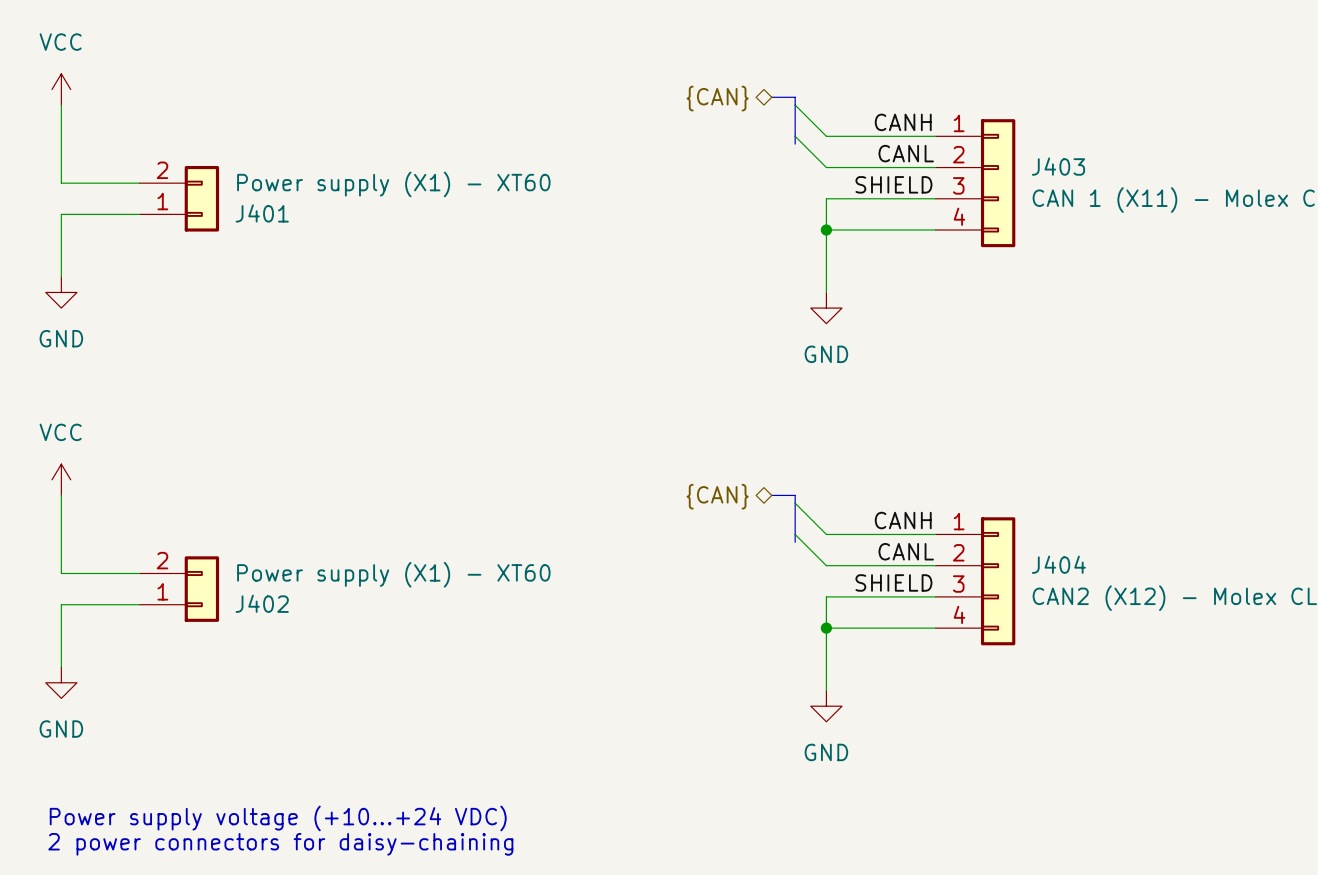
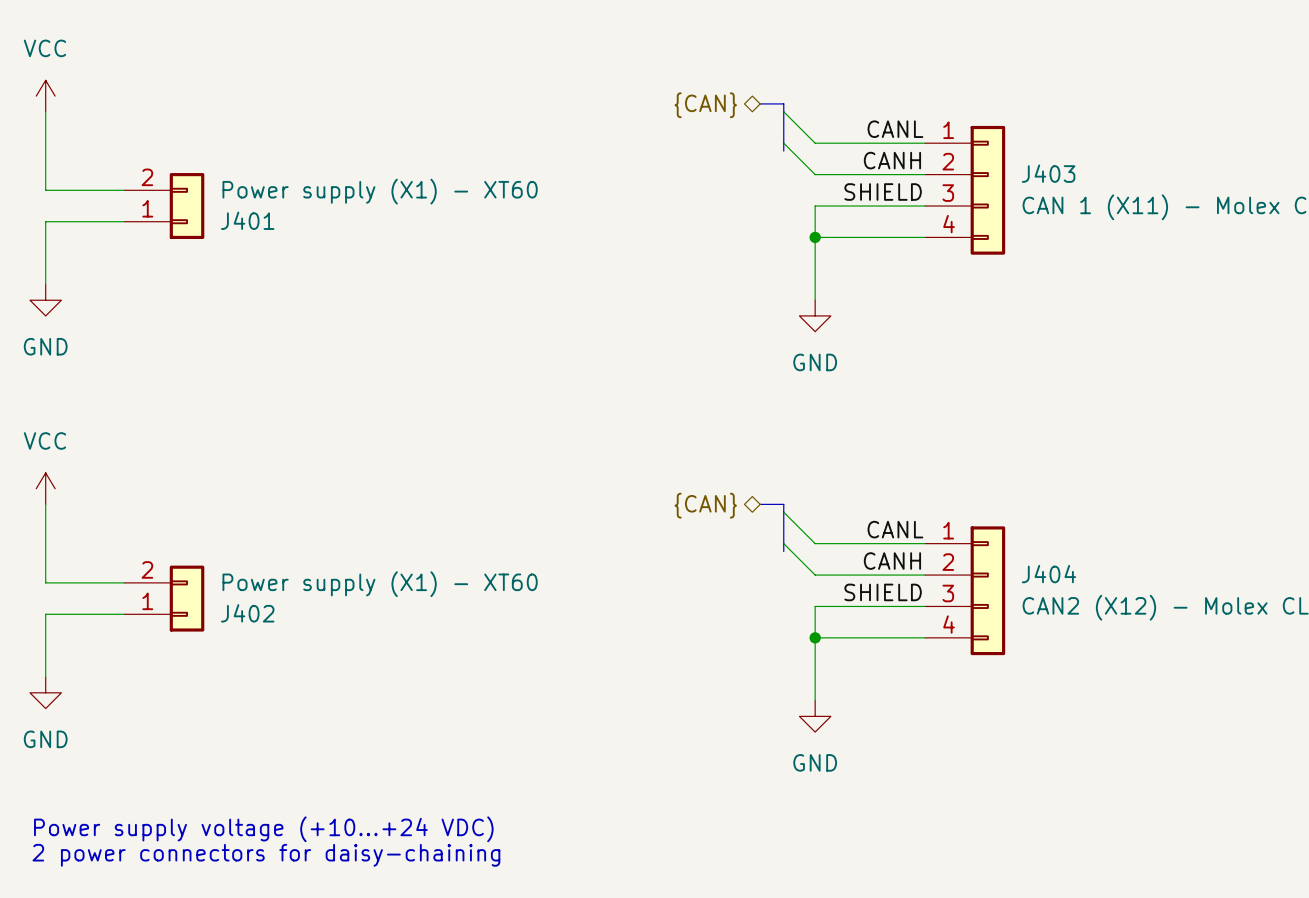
label: CANH (903, 122) -> CANL (895, 129)
label: CANL (906, 153) -> CANH (892, 160)
label: CANH (903, 520) -> CANL (895, 529)
label: CANL (906, 551) -> CANH (892, 561)

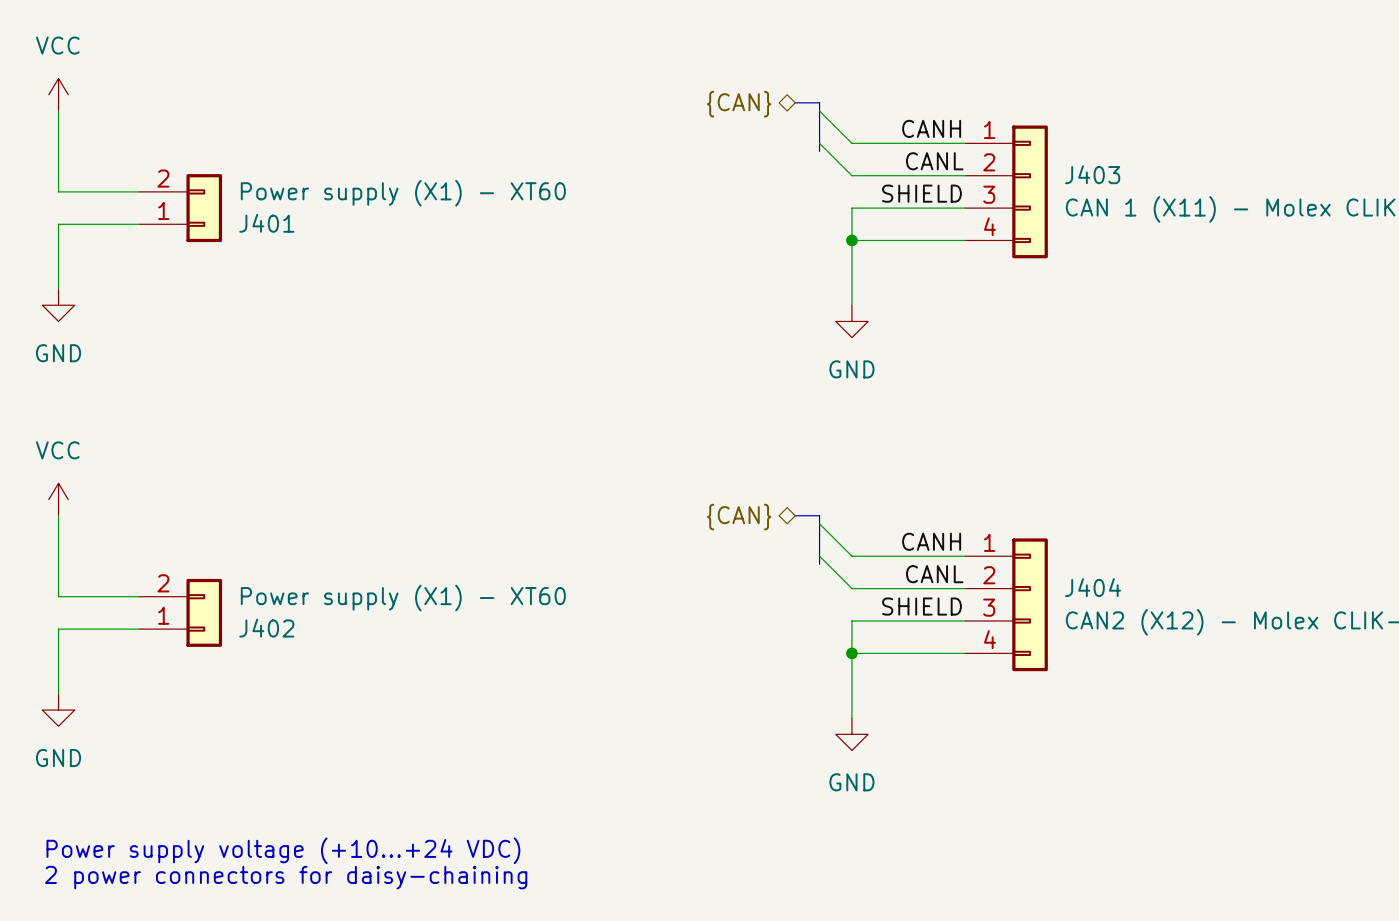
label: CANL (895, 129) -> CANH (931, 128)
label: CANH (892, 160) -> CANL (934, 161)
label: CANL (895, 529) -> CANH (931, 541)
label: CANH (892, 561) -> CANL (934, 574)

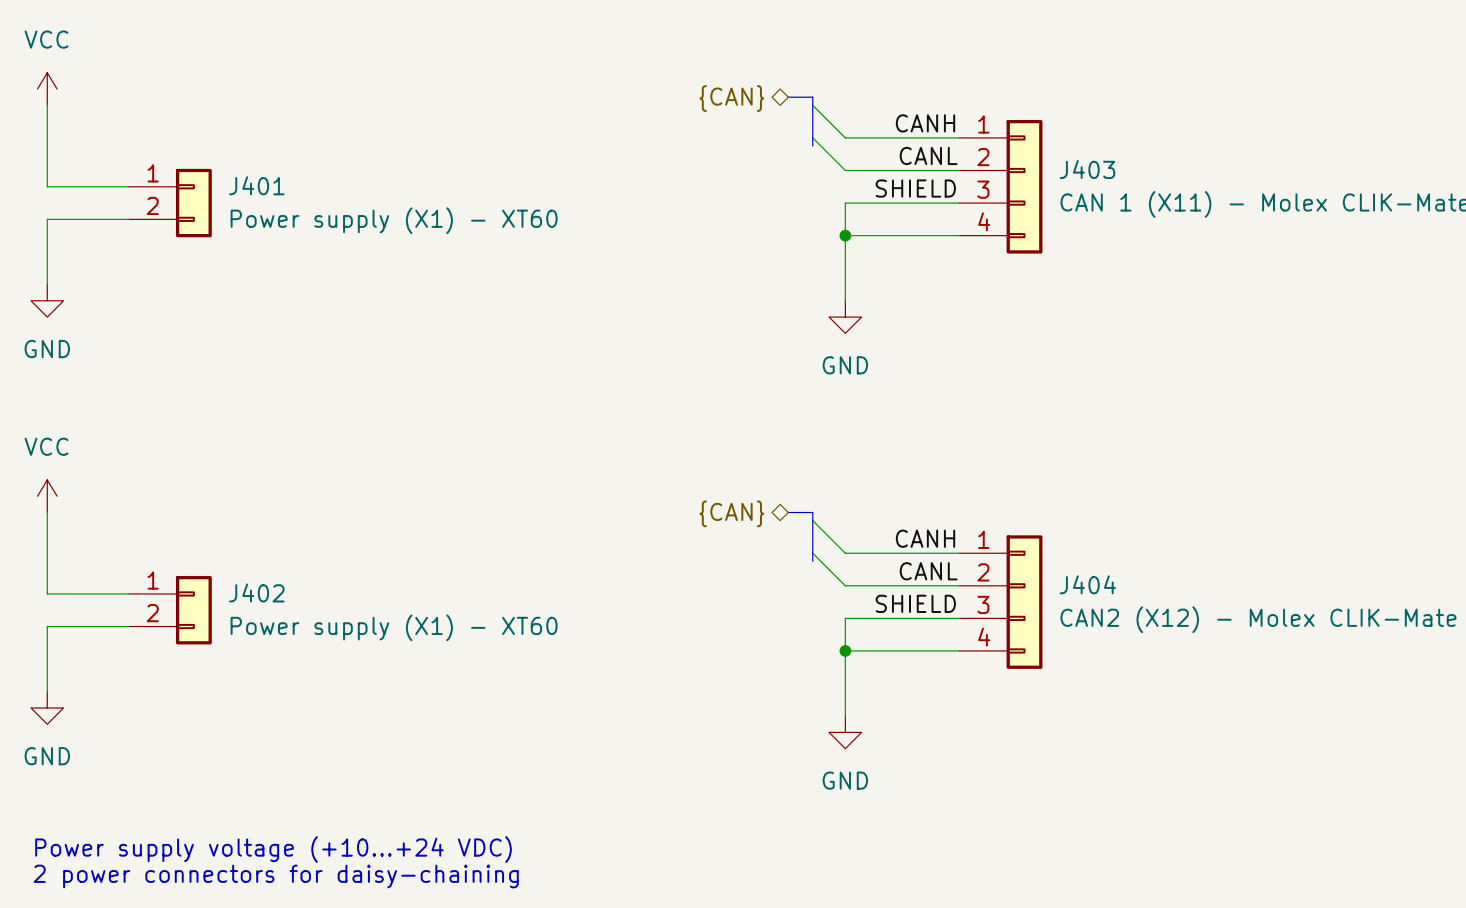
J401 flip: as is (204, 208) -> up-down (193, 203)
J402 flip: as is (204, 612) -> up-down (193, 610)

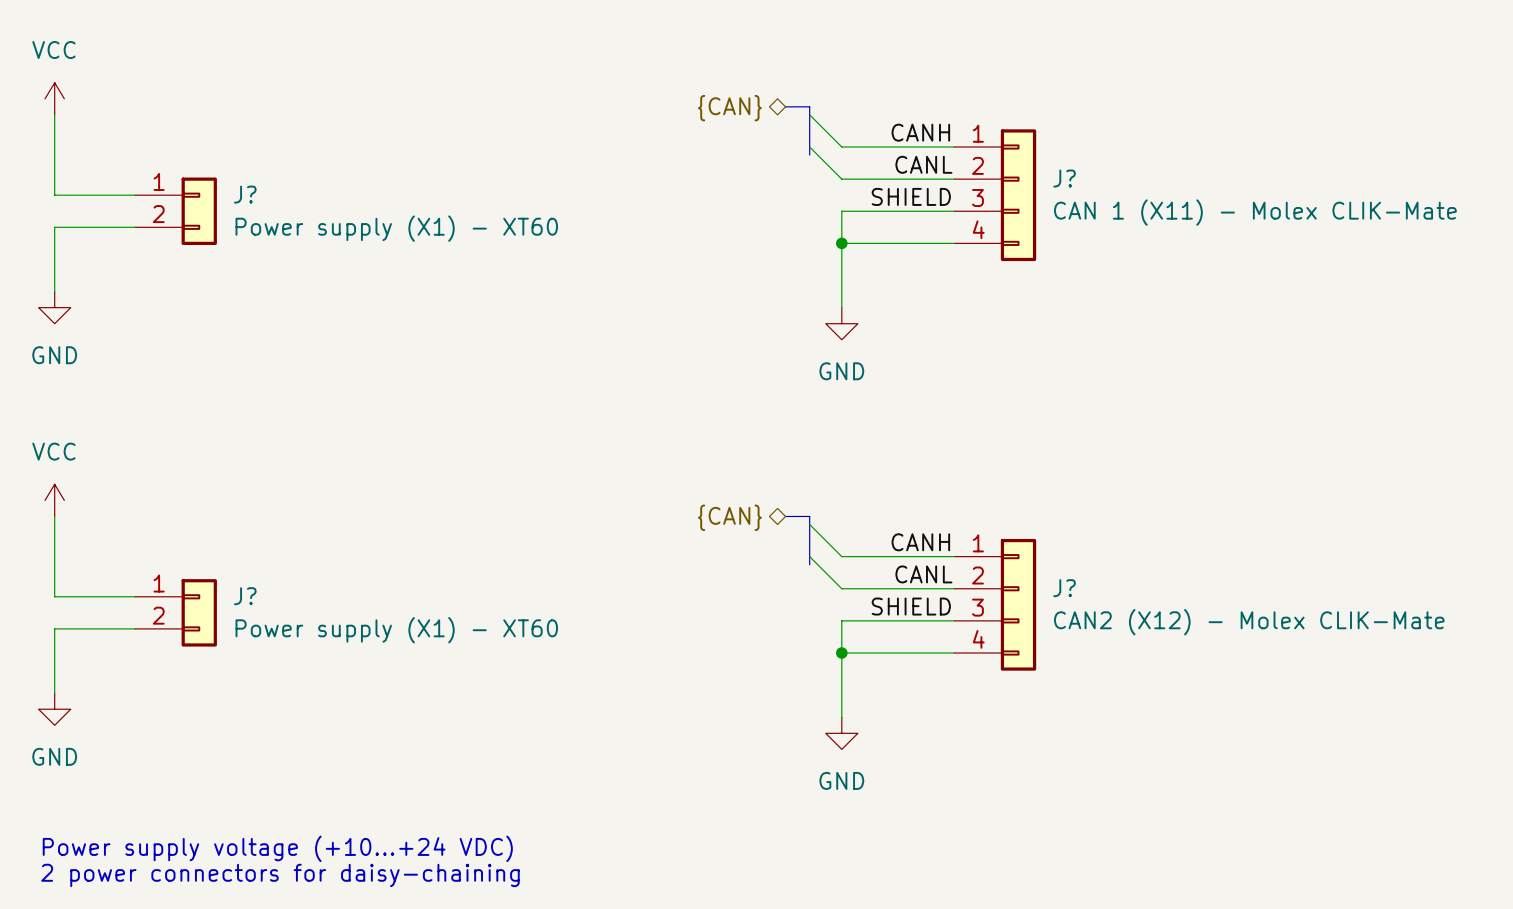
J403 name: J403 (1087, 169) -> J? (1064, 178)
J401 name: J401 (256, 185) -> J? (245, 194)
J404 name: J404 (1087, 584) -> J? (1064, 588)
J402 name: J402 (256, 592) -> J? (245, 596)

